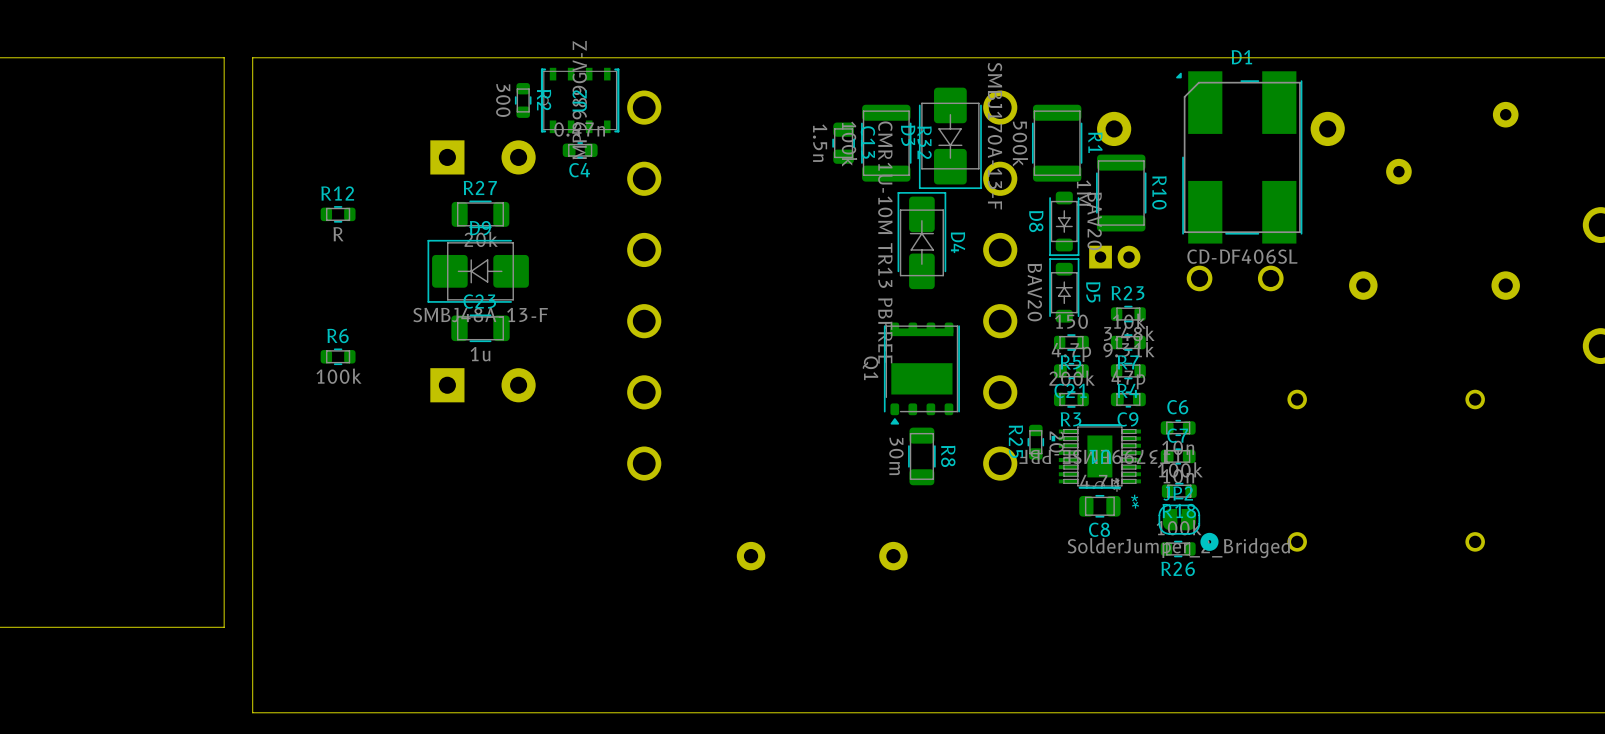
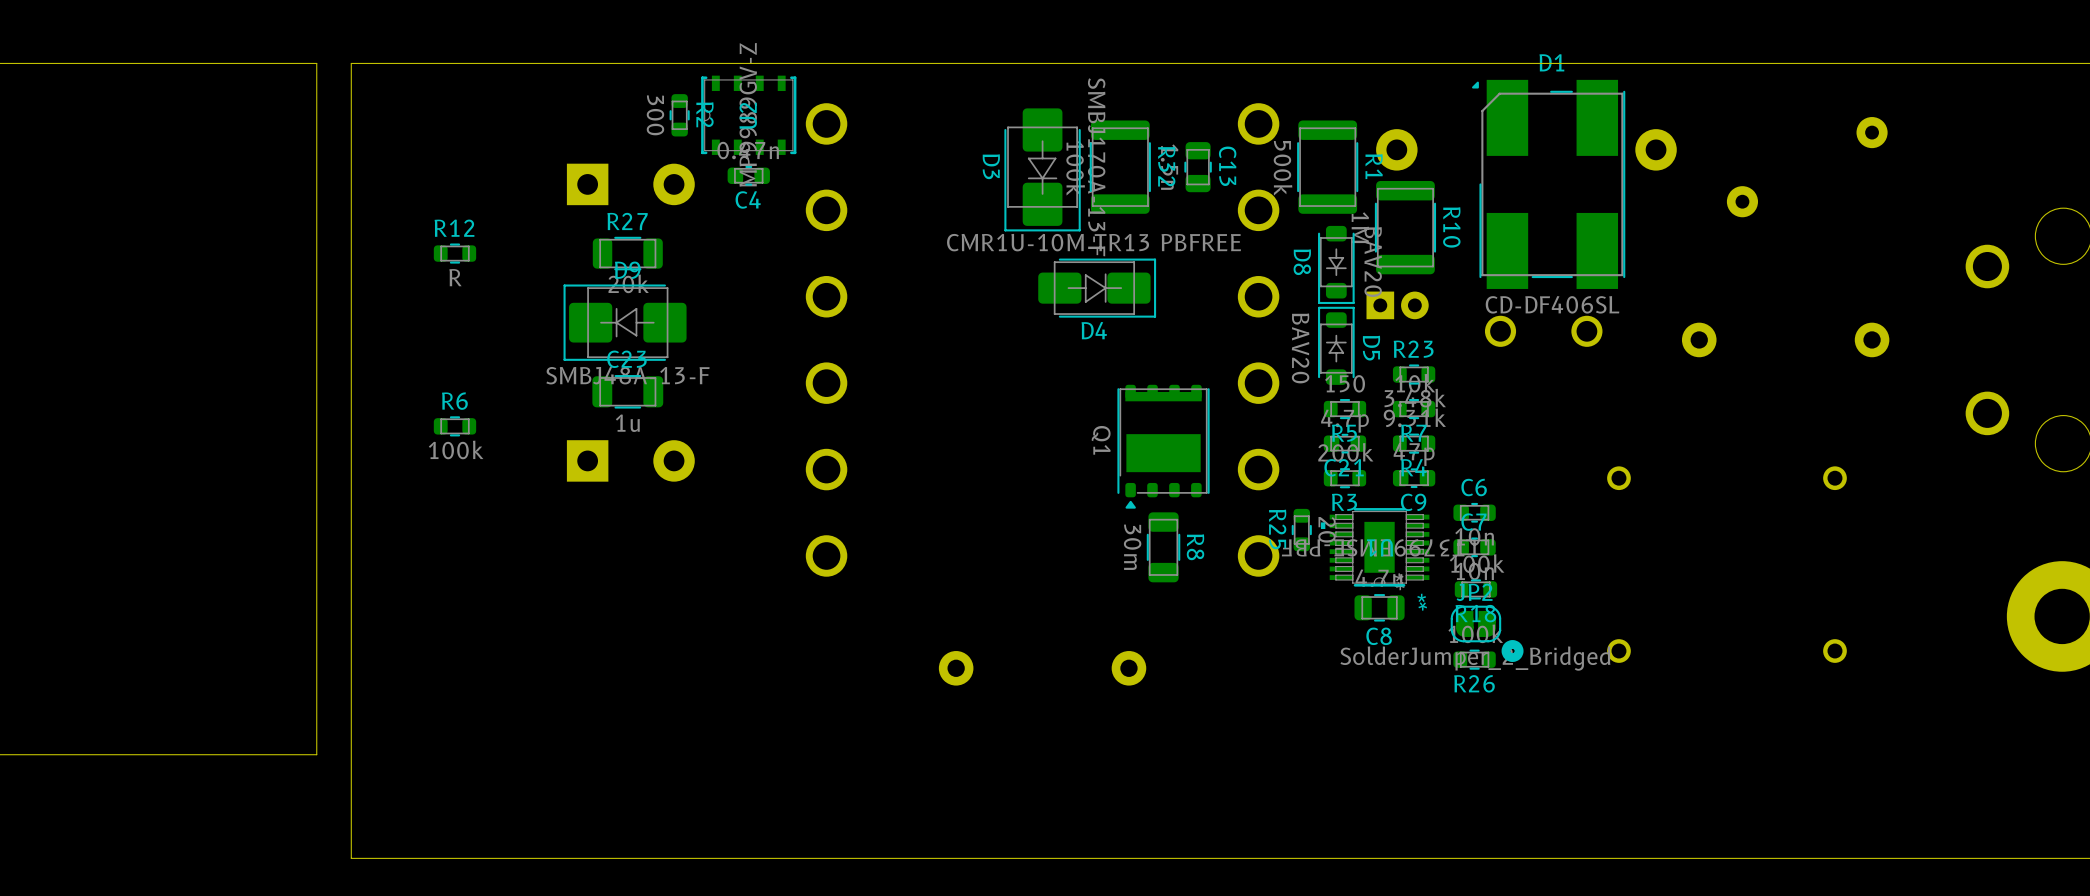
D3 position: (950, 138) -> (1042, 169)
C13 position: (843, 143) -> (1198, 167)
D4 rotation: 0° (921, 240) -> 90° clockwise (1097, 288)

